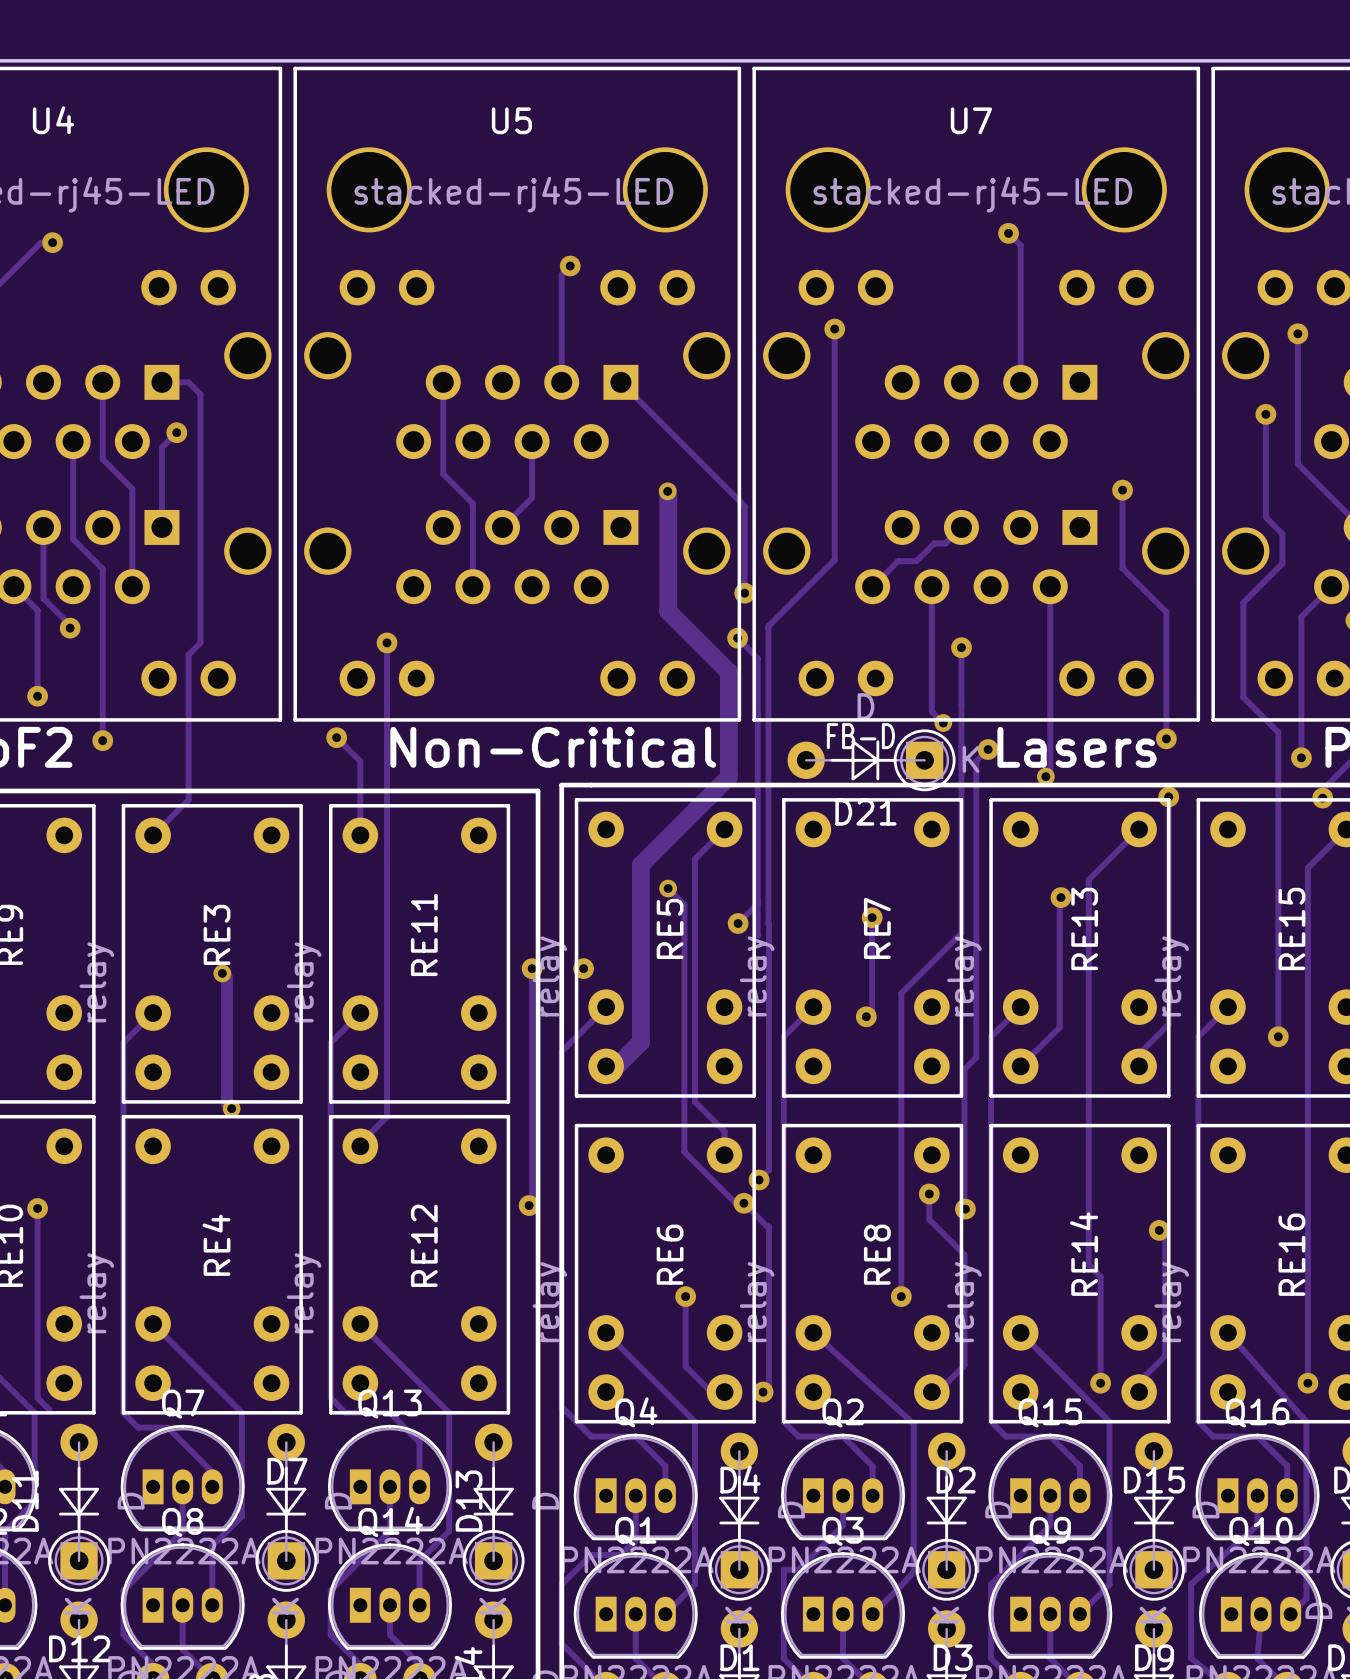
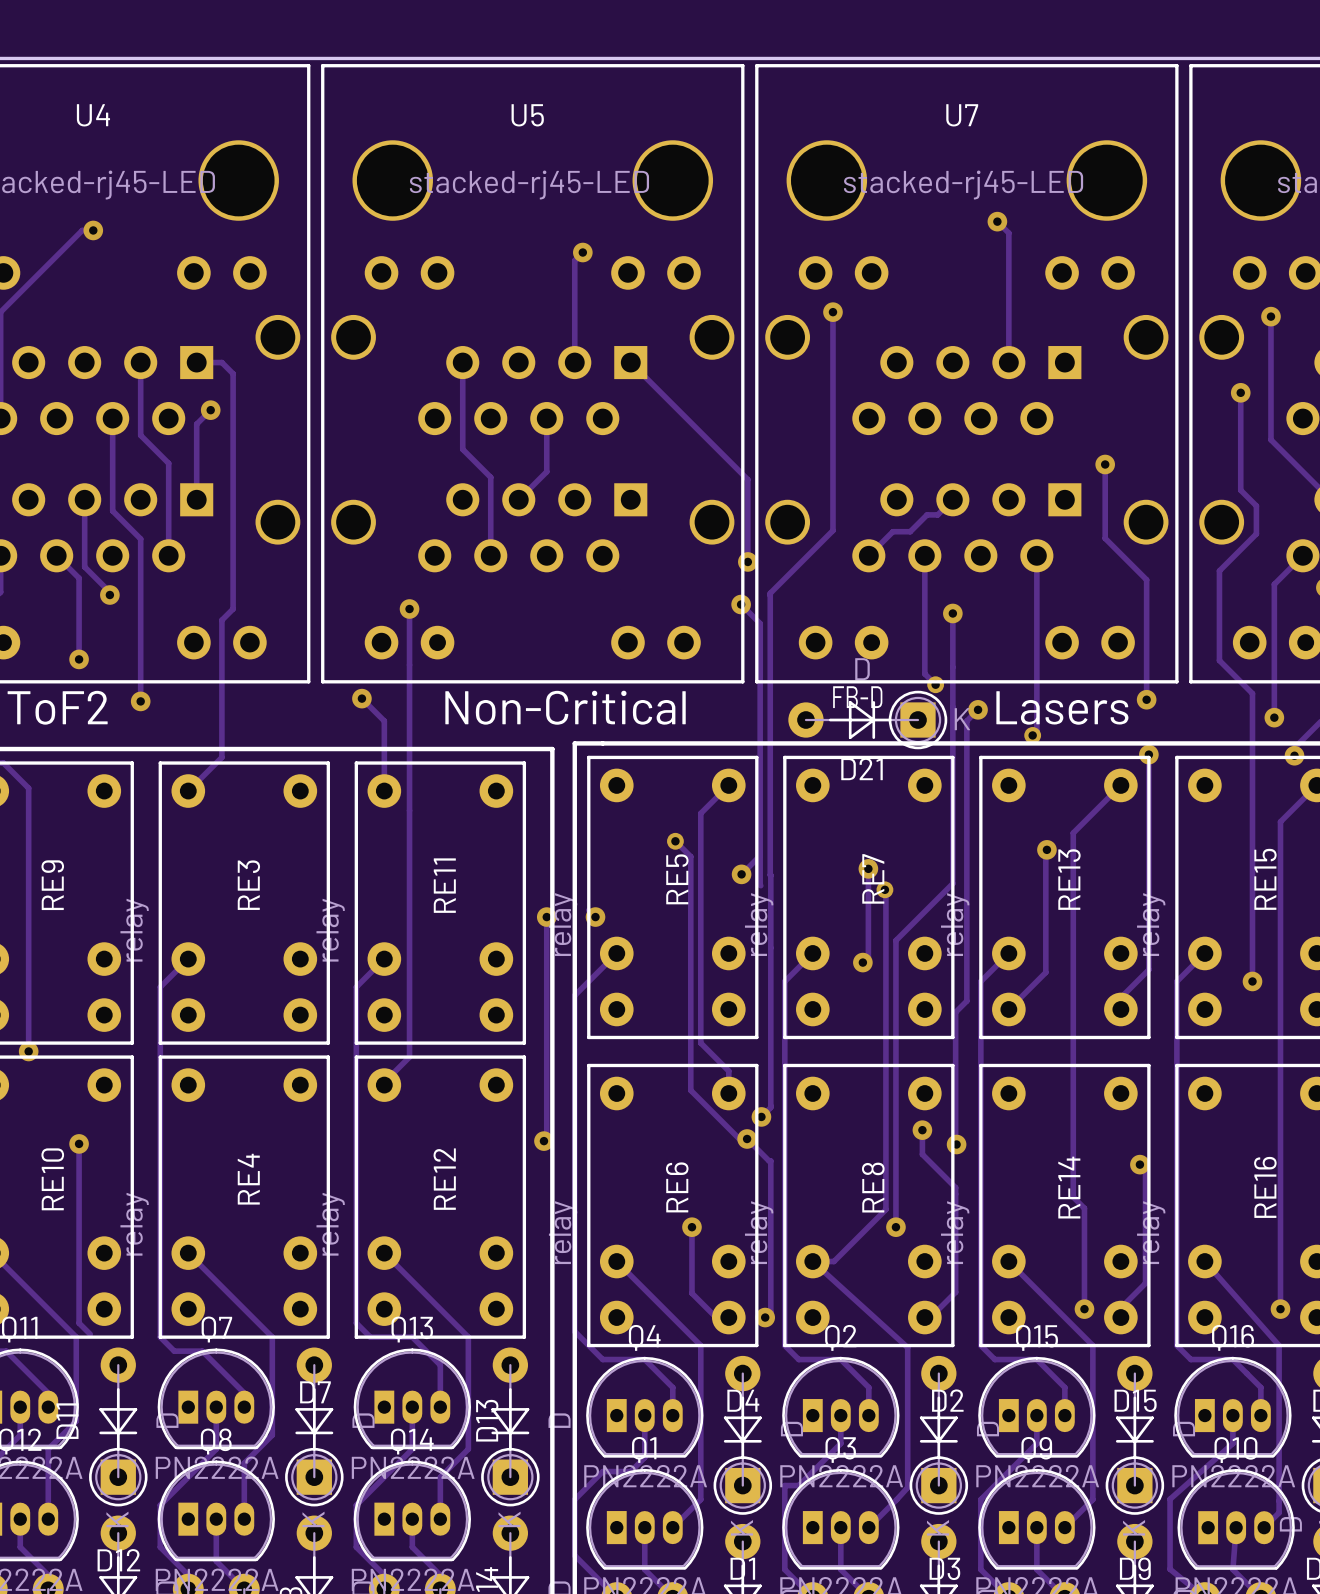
track: (667, 491) (668, 611) (728, 672) (728, 776) (640, 864) (640, 1042) (616, 1066) (606, 1066) -> none
via: (667, 491) -> none
track: none -> (884, 889) (885, 1209) (833, 1261) (812, 1261)
via: none -> (884, 889)
track: (222, 973) (227, 978) (227, 1103) (231, 1108) -> none
via: (222, 973) -> none
via: (231, 1108) -> none

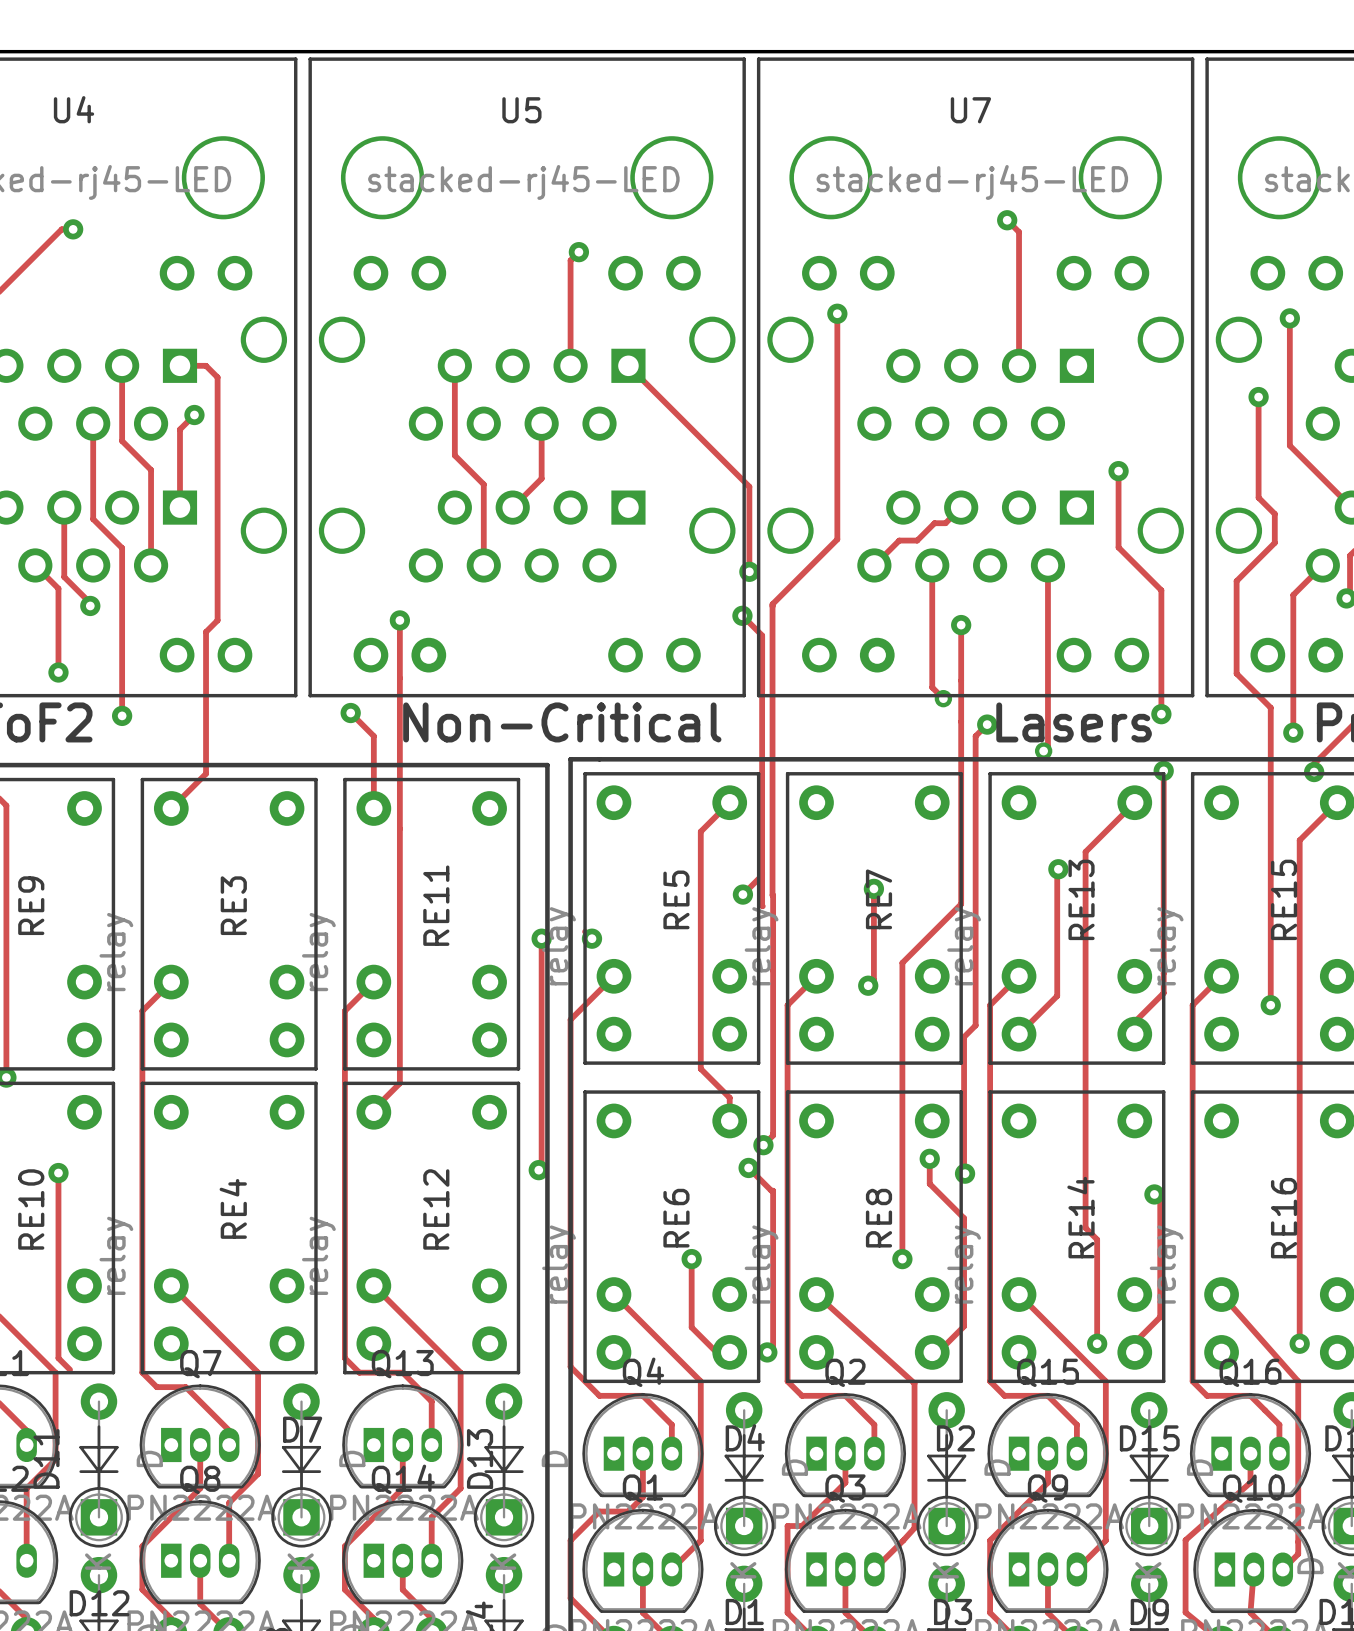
text: FB-D (857, 697) -> none
D21: D (867, 720) -> none
track: (675, 841) (690, 856) (690, 1090) (739, 1138) (747, 1138) -> none
via: (675, 841) -> none
track: (884, 889) (885, 1209) (833, 1261) (812, 1261) -> none
via: (884, 889) -> none

